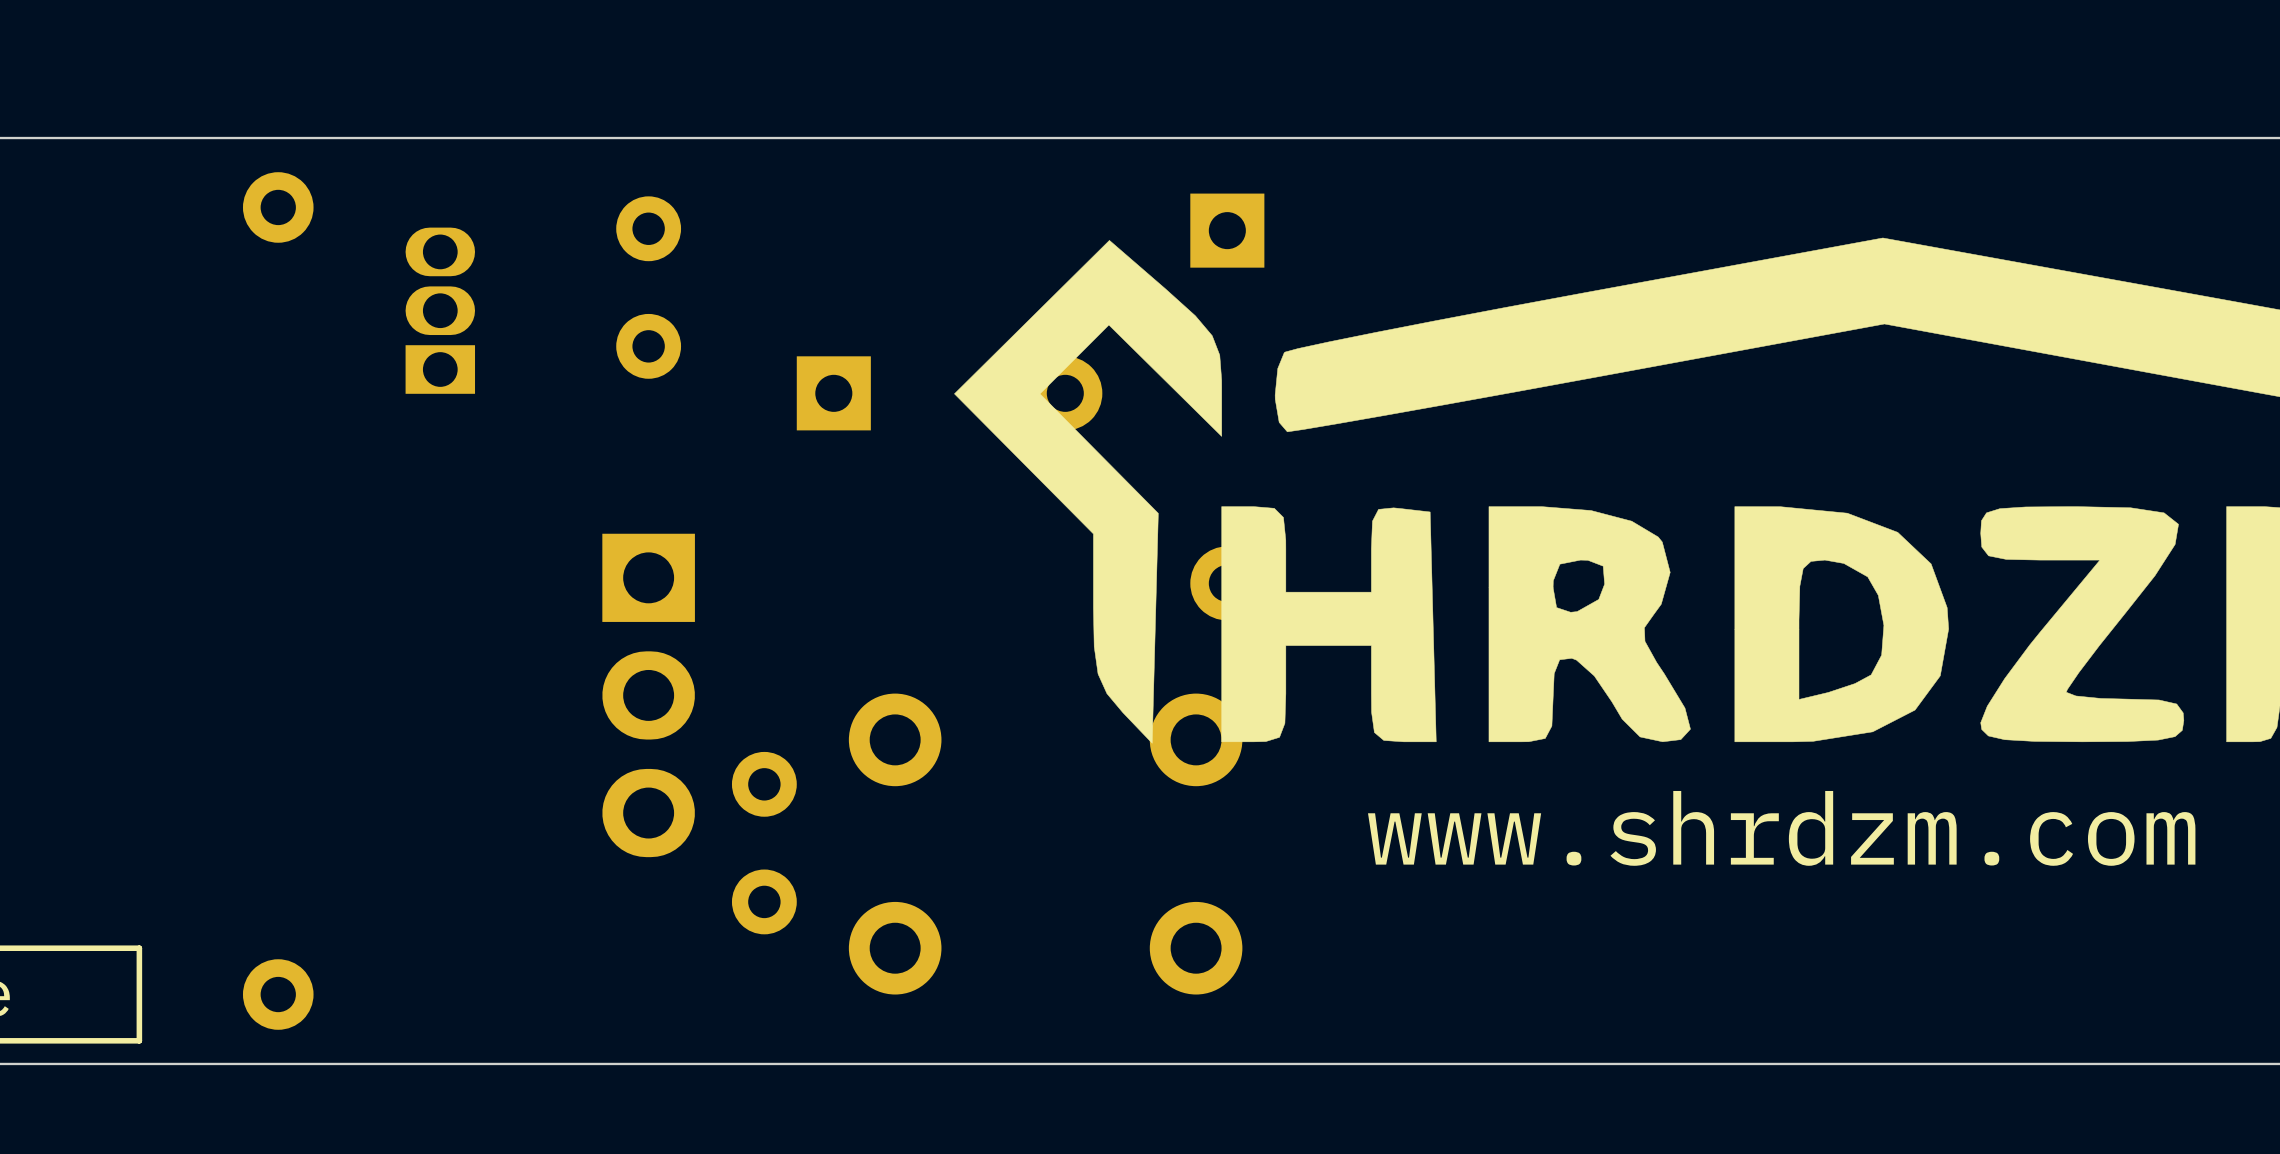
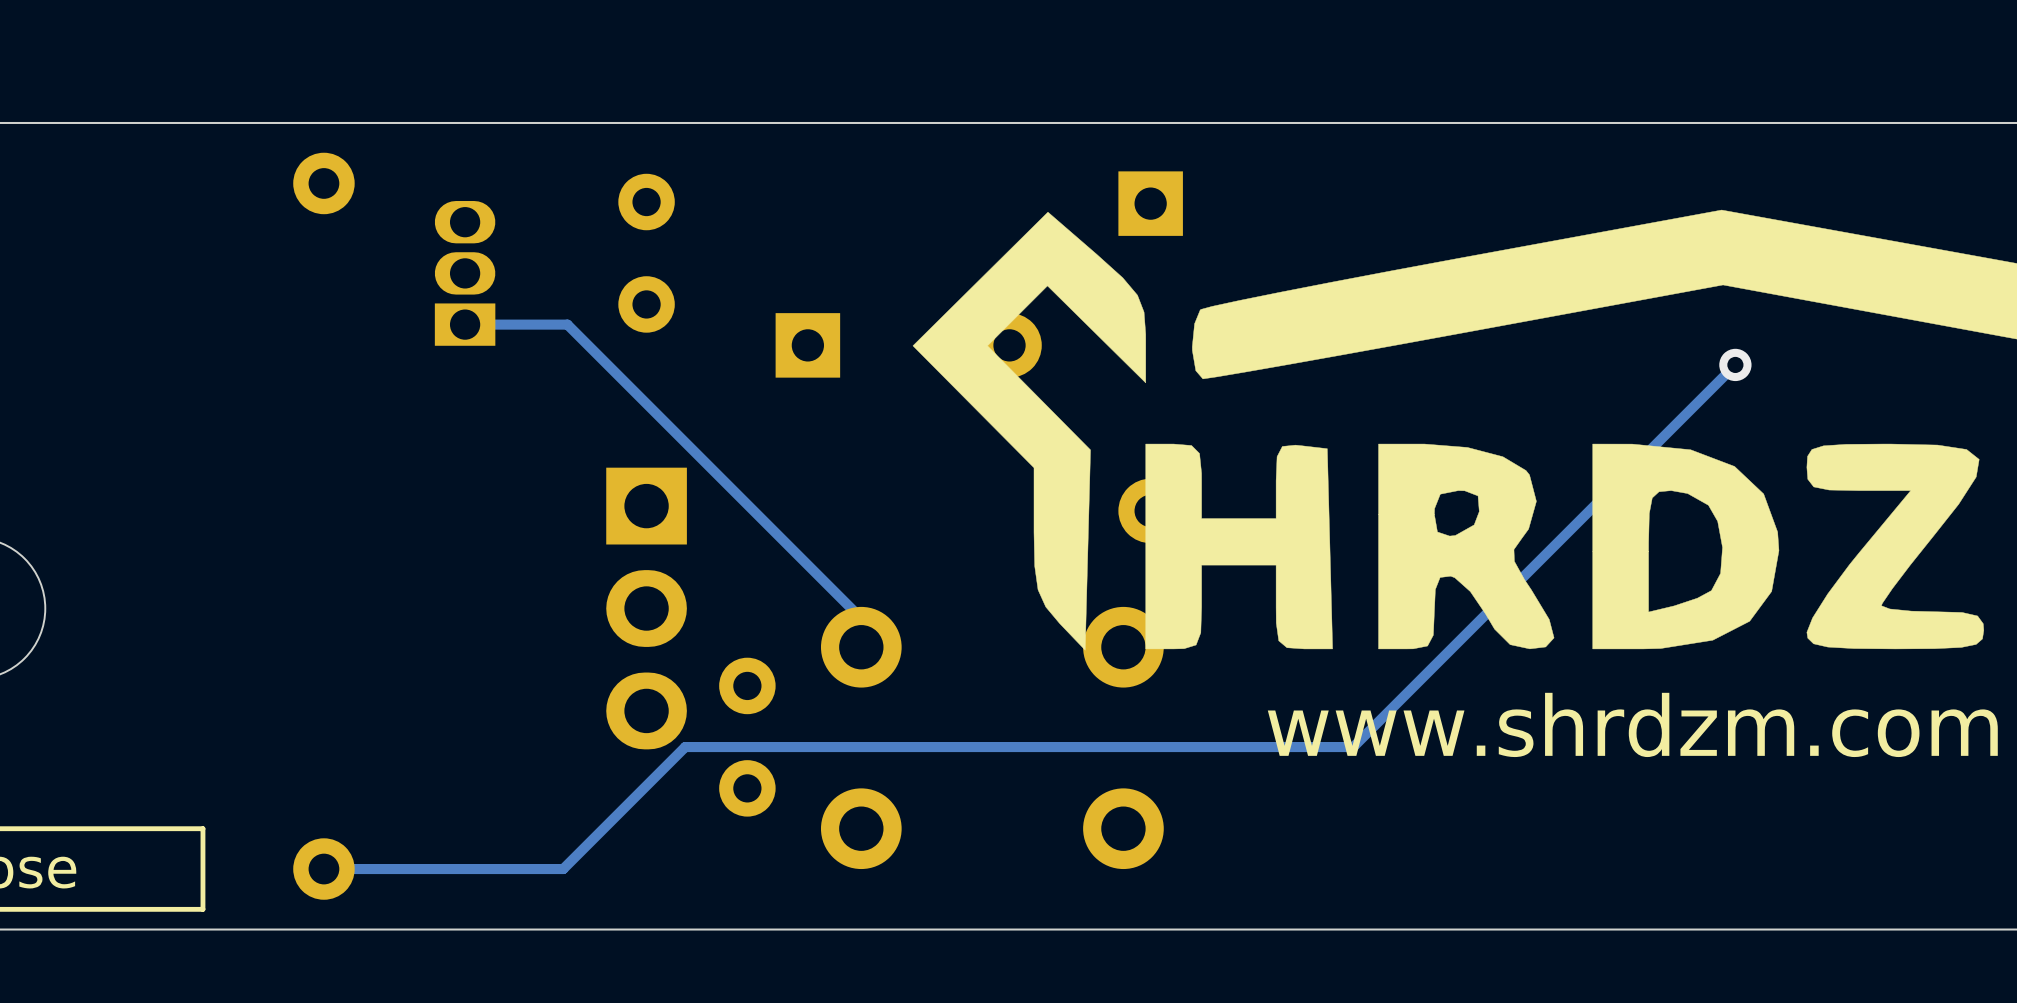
track: none -> (465, 324) (567, 324) (861, 618) (861, 647)
track: none -> (1735, 364) (1353, 747) (685, 747) (563, 869) (323, 869)
via: none -> (1735, 364)

